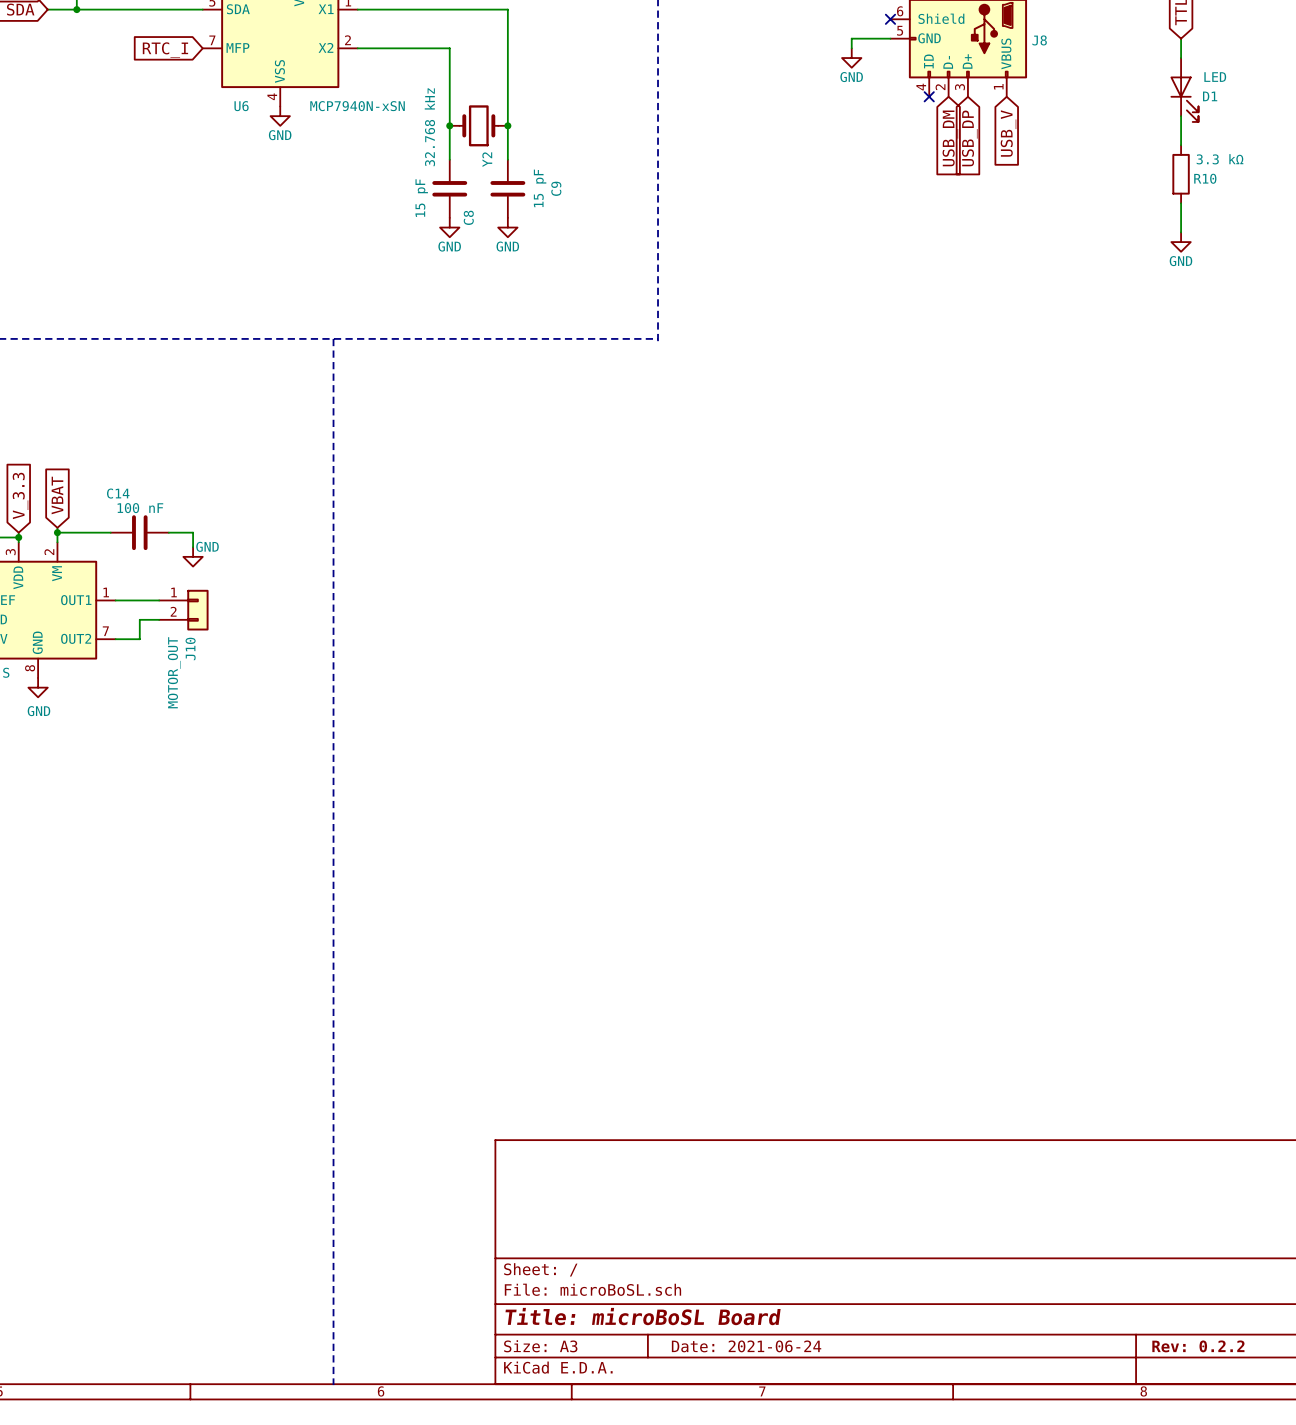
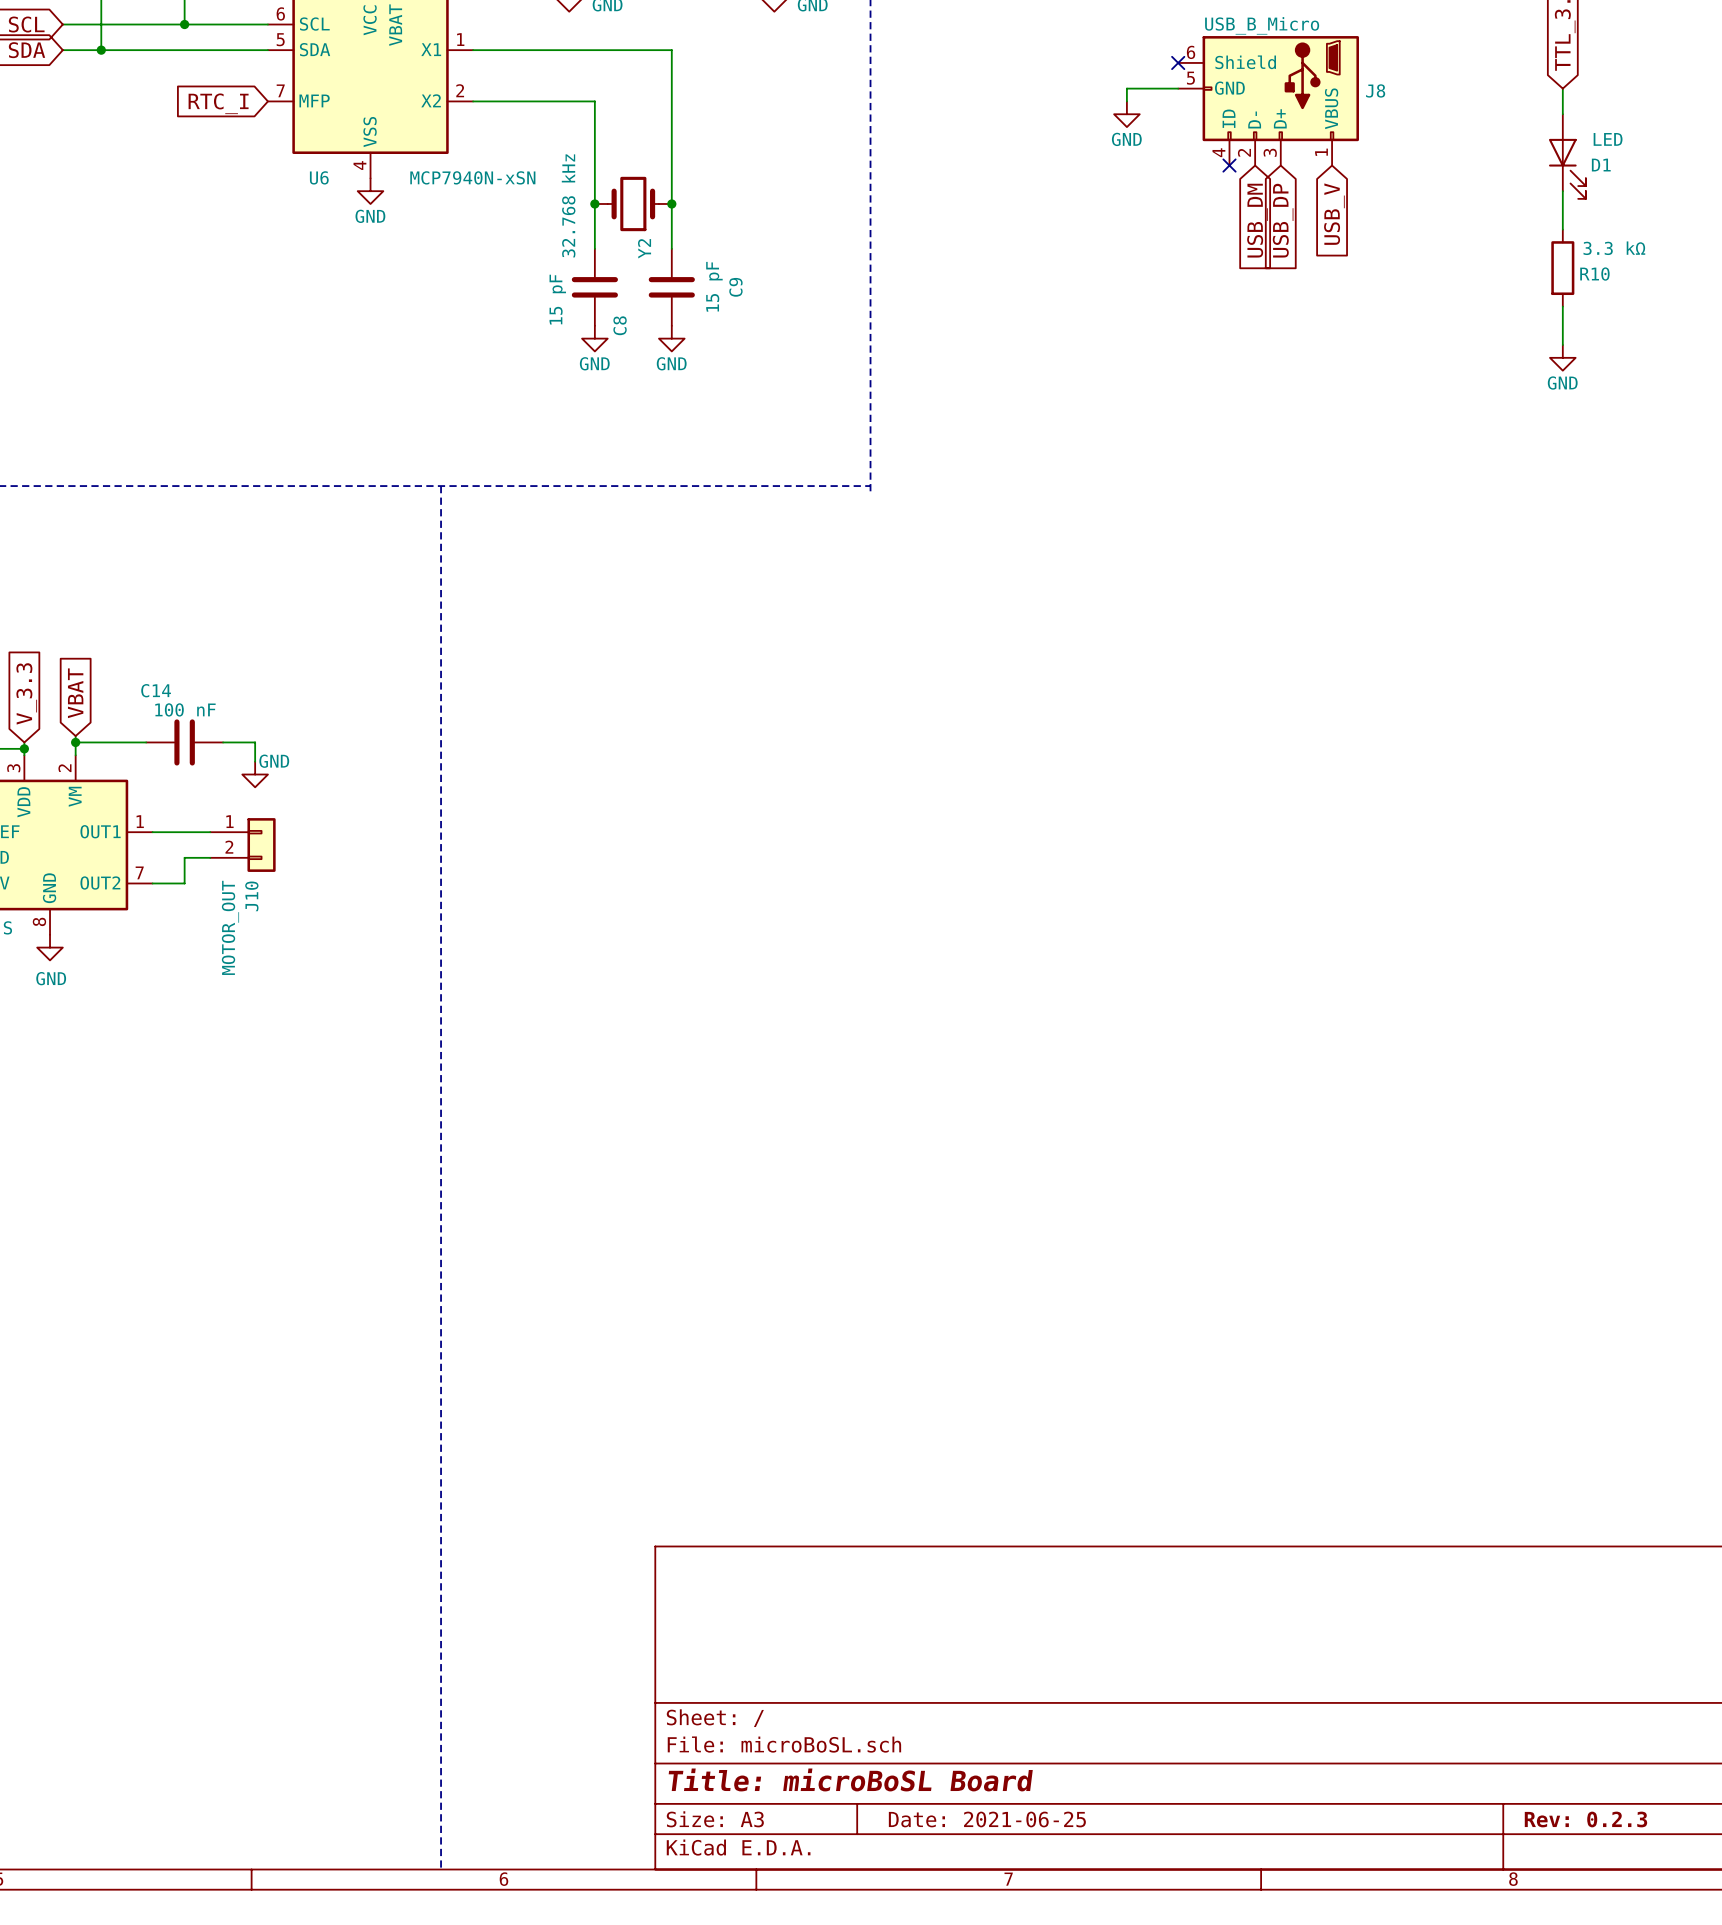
title block: Date: 2021-06-24 (746, 1346) -> Date: 2021-06-25 (987, 1819)
title block: Rev: 0.2.2 (1198, 1346) -> Rev: 0.2.3 (1585, 1819)

